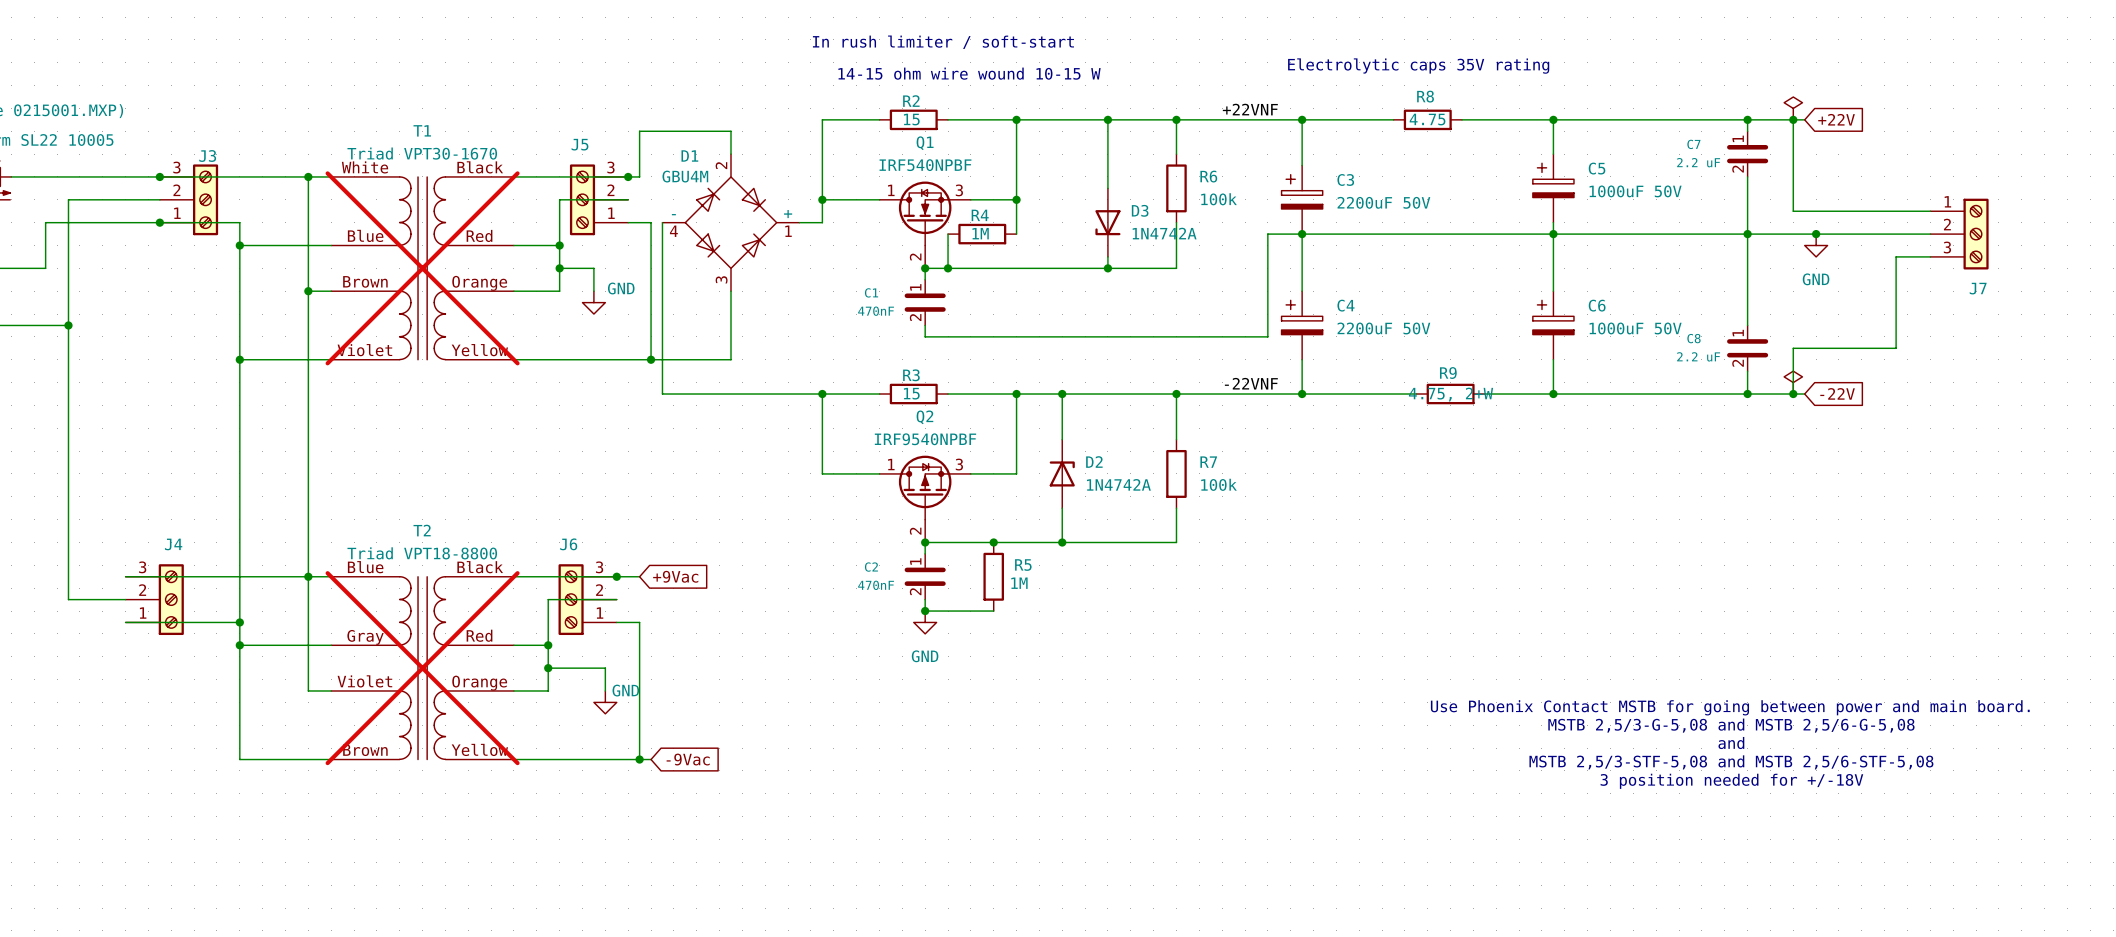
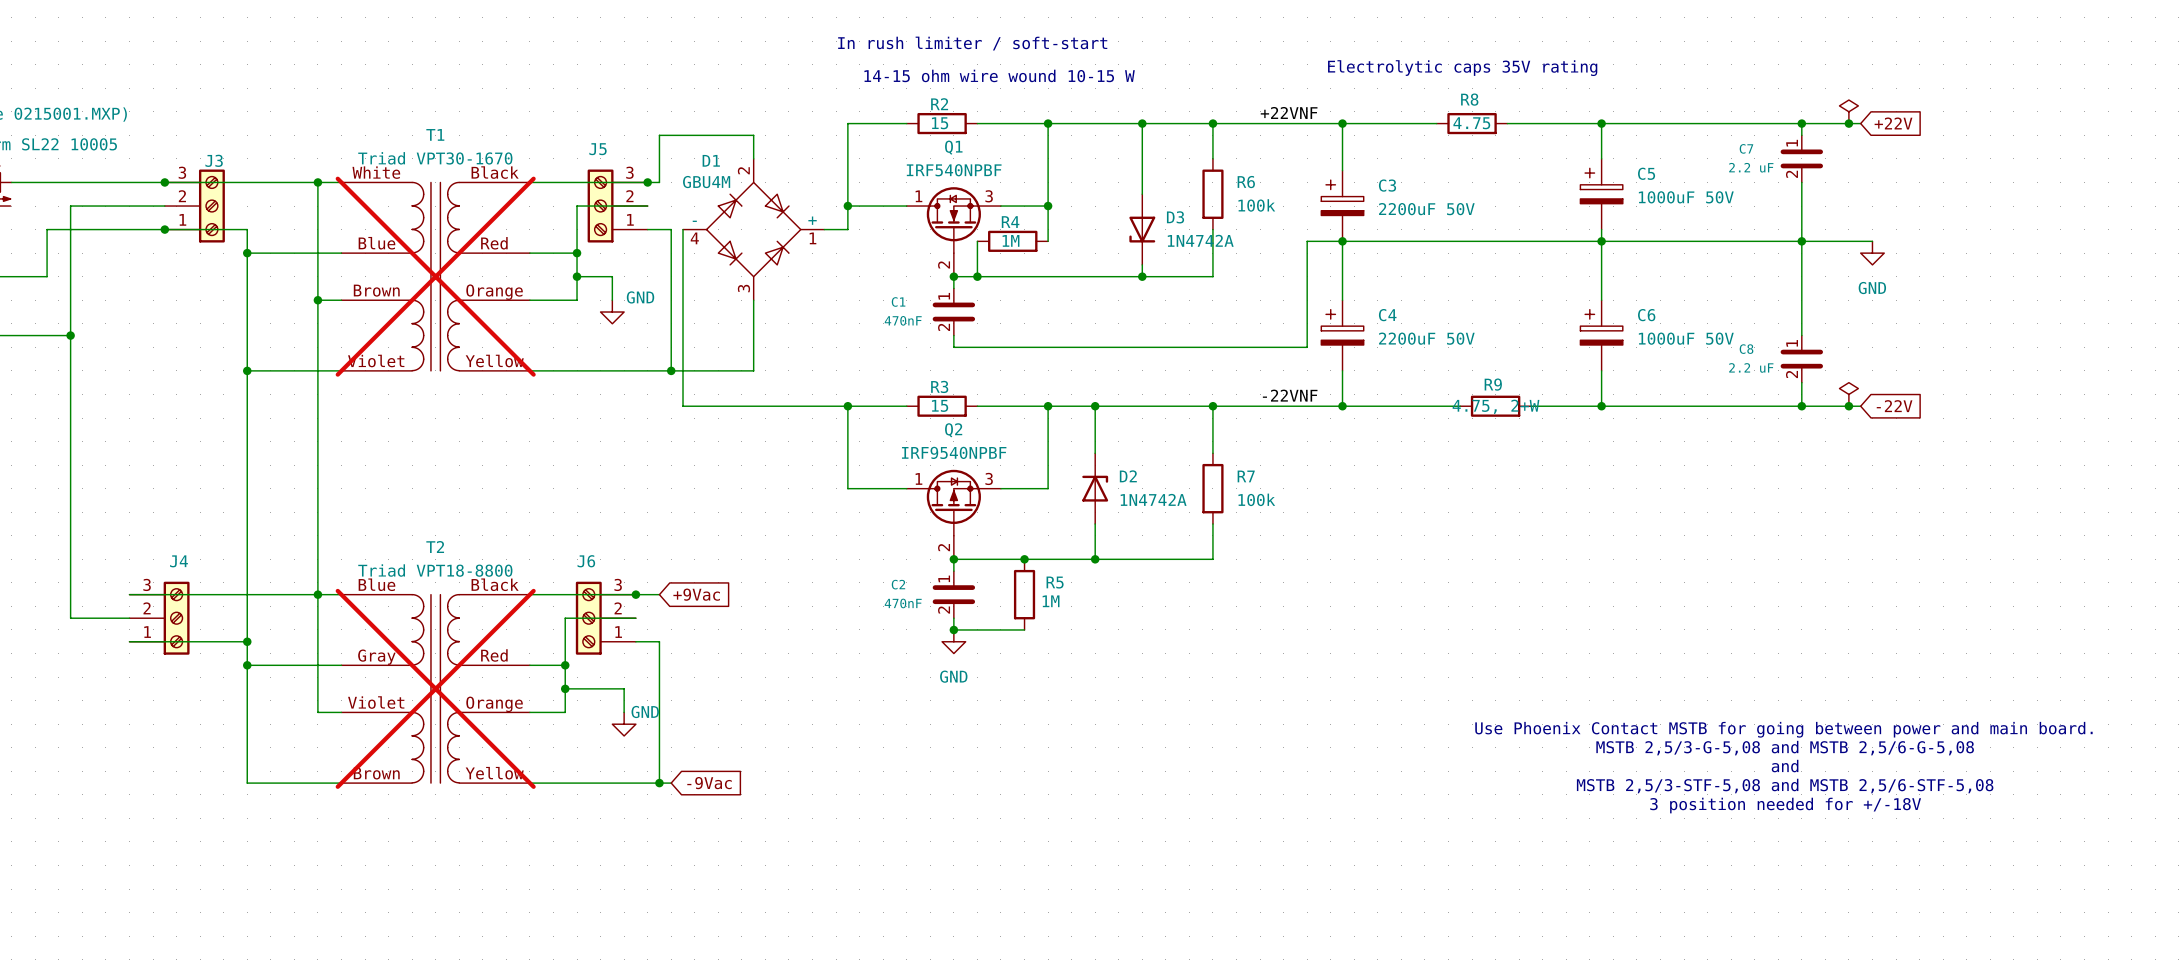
wire: (1793, 119) (1793, 211) (1930, 211) -> none
wire: (1816, 234) (1930, 234) -> none
junction: (1816, 234) -> none
J7: (1959, 234) -> none
wire: (1930, 256) (1896, 256) (1896, 348) (1793, 348) (1793, 394) -> none

